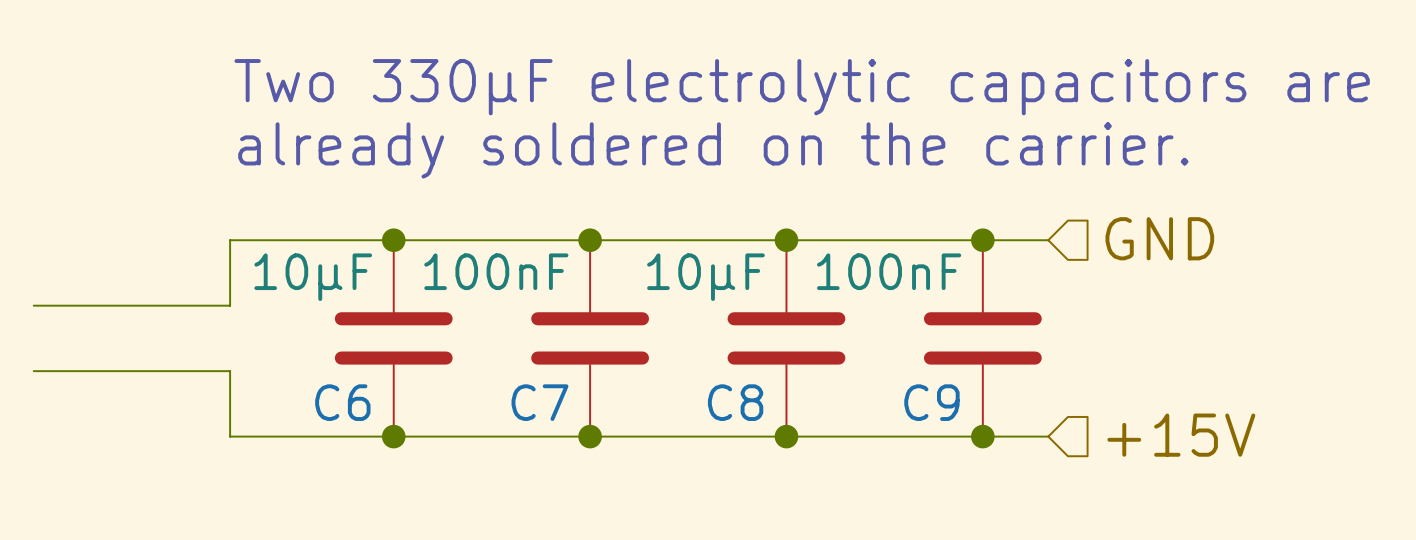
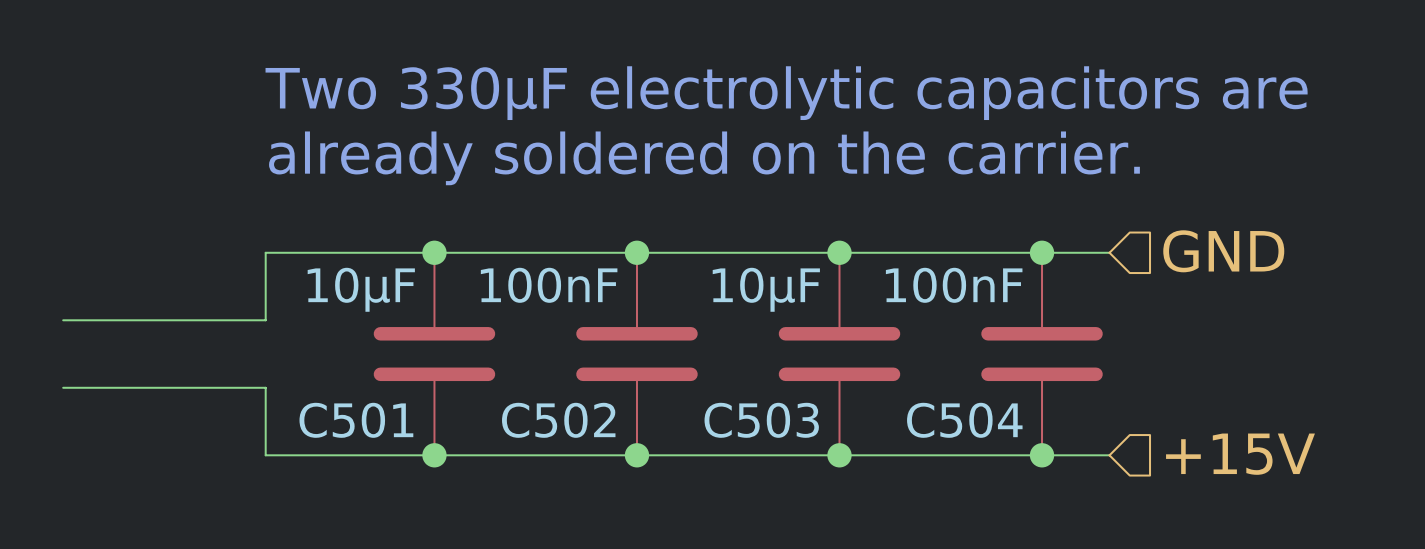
C6 name: C6 (342, 402) -> C501 (356, 420)
C7 name: C7 (539, 402) -> C502 (558, 420)
C8 name: C8 (735, 402) -> C503 (761, 420)
C9 name: C9 (931, 402) -> C504 (964, 420)

